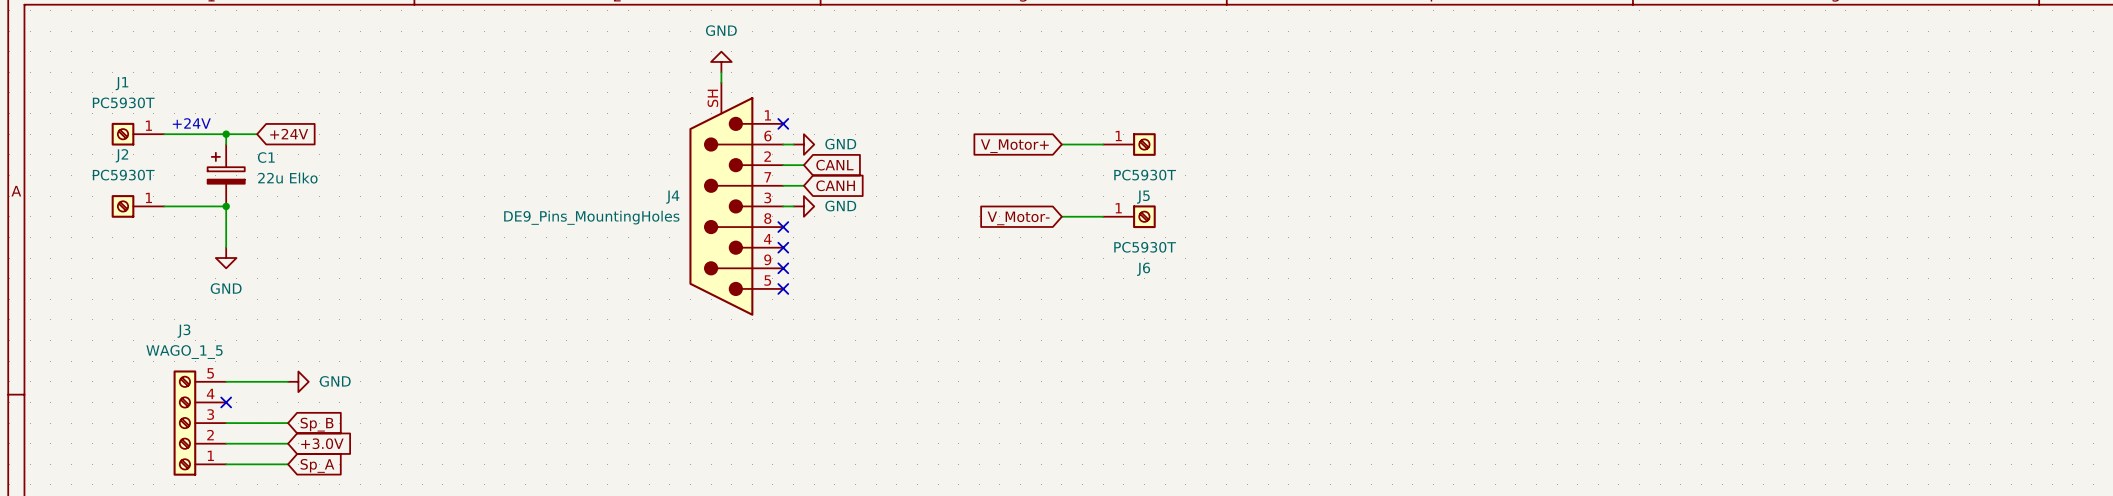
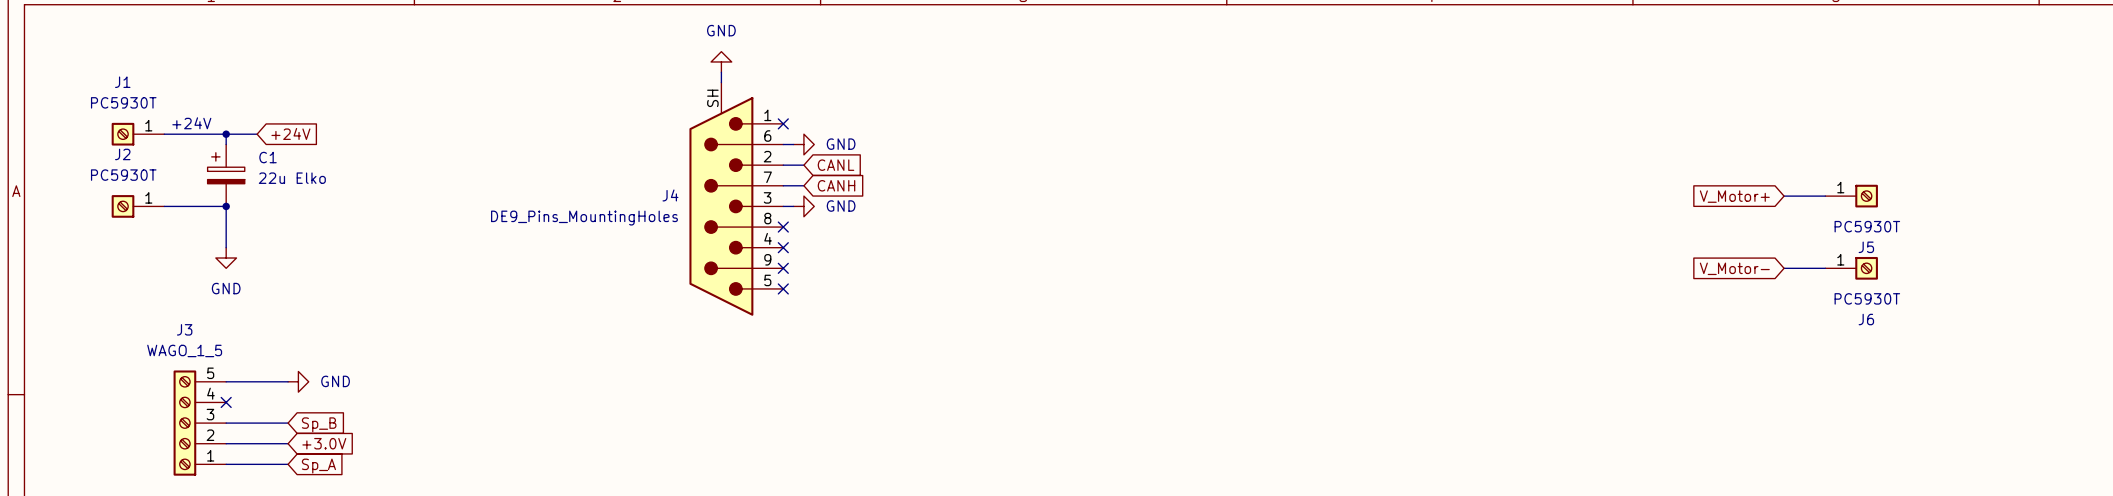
wire: (1061, 144) (1103, 144) -> none
J5 position: (1129, 144) -> (1851, 196)
global label: V_Motor+ (1014, 146) -> none
wire: none -> (1784, 196) (1825, 196)
global label: none -> V_Motor+ (1734, 196)
wire: (1061, 216) (1103, 216) -> none
J6 position: (1129, 216) -> (1851, 268)
global label: V_Motor- (1018, 218) -> none
wire: none -> (1784, 268) (1825, 268)
global label: none -> V_Motor- (1734, 268)

